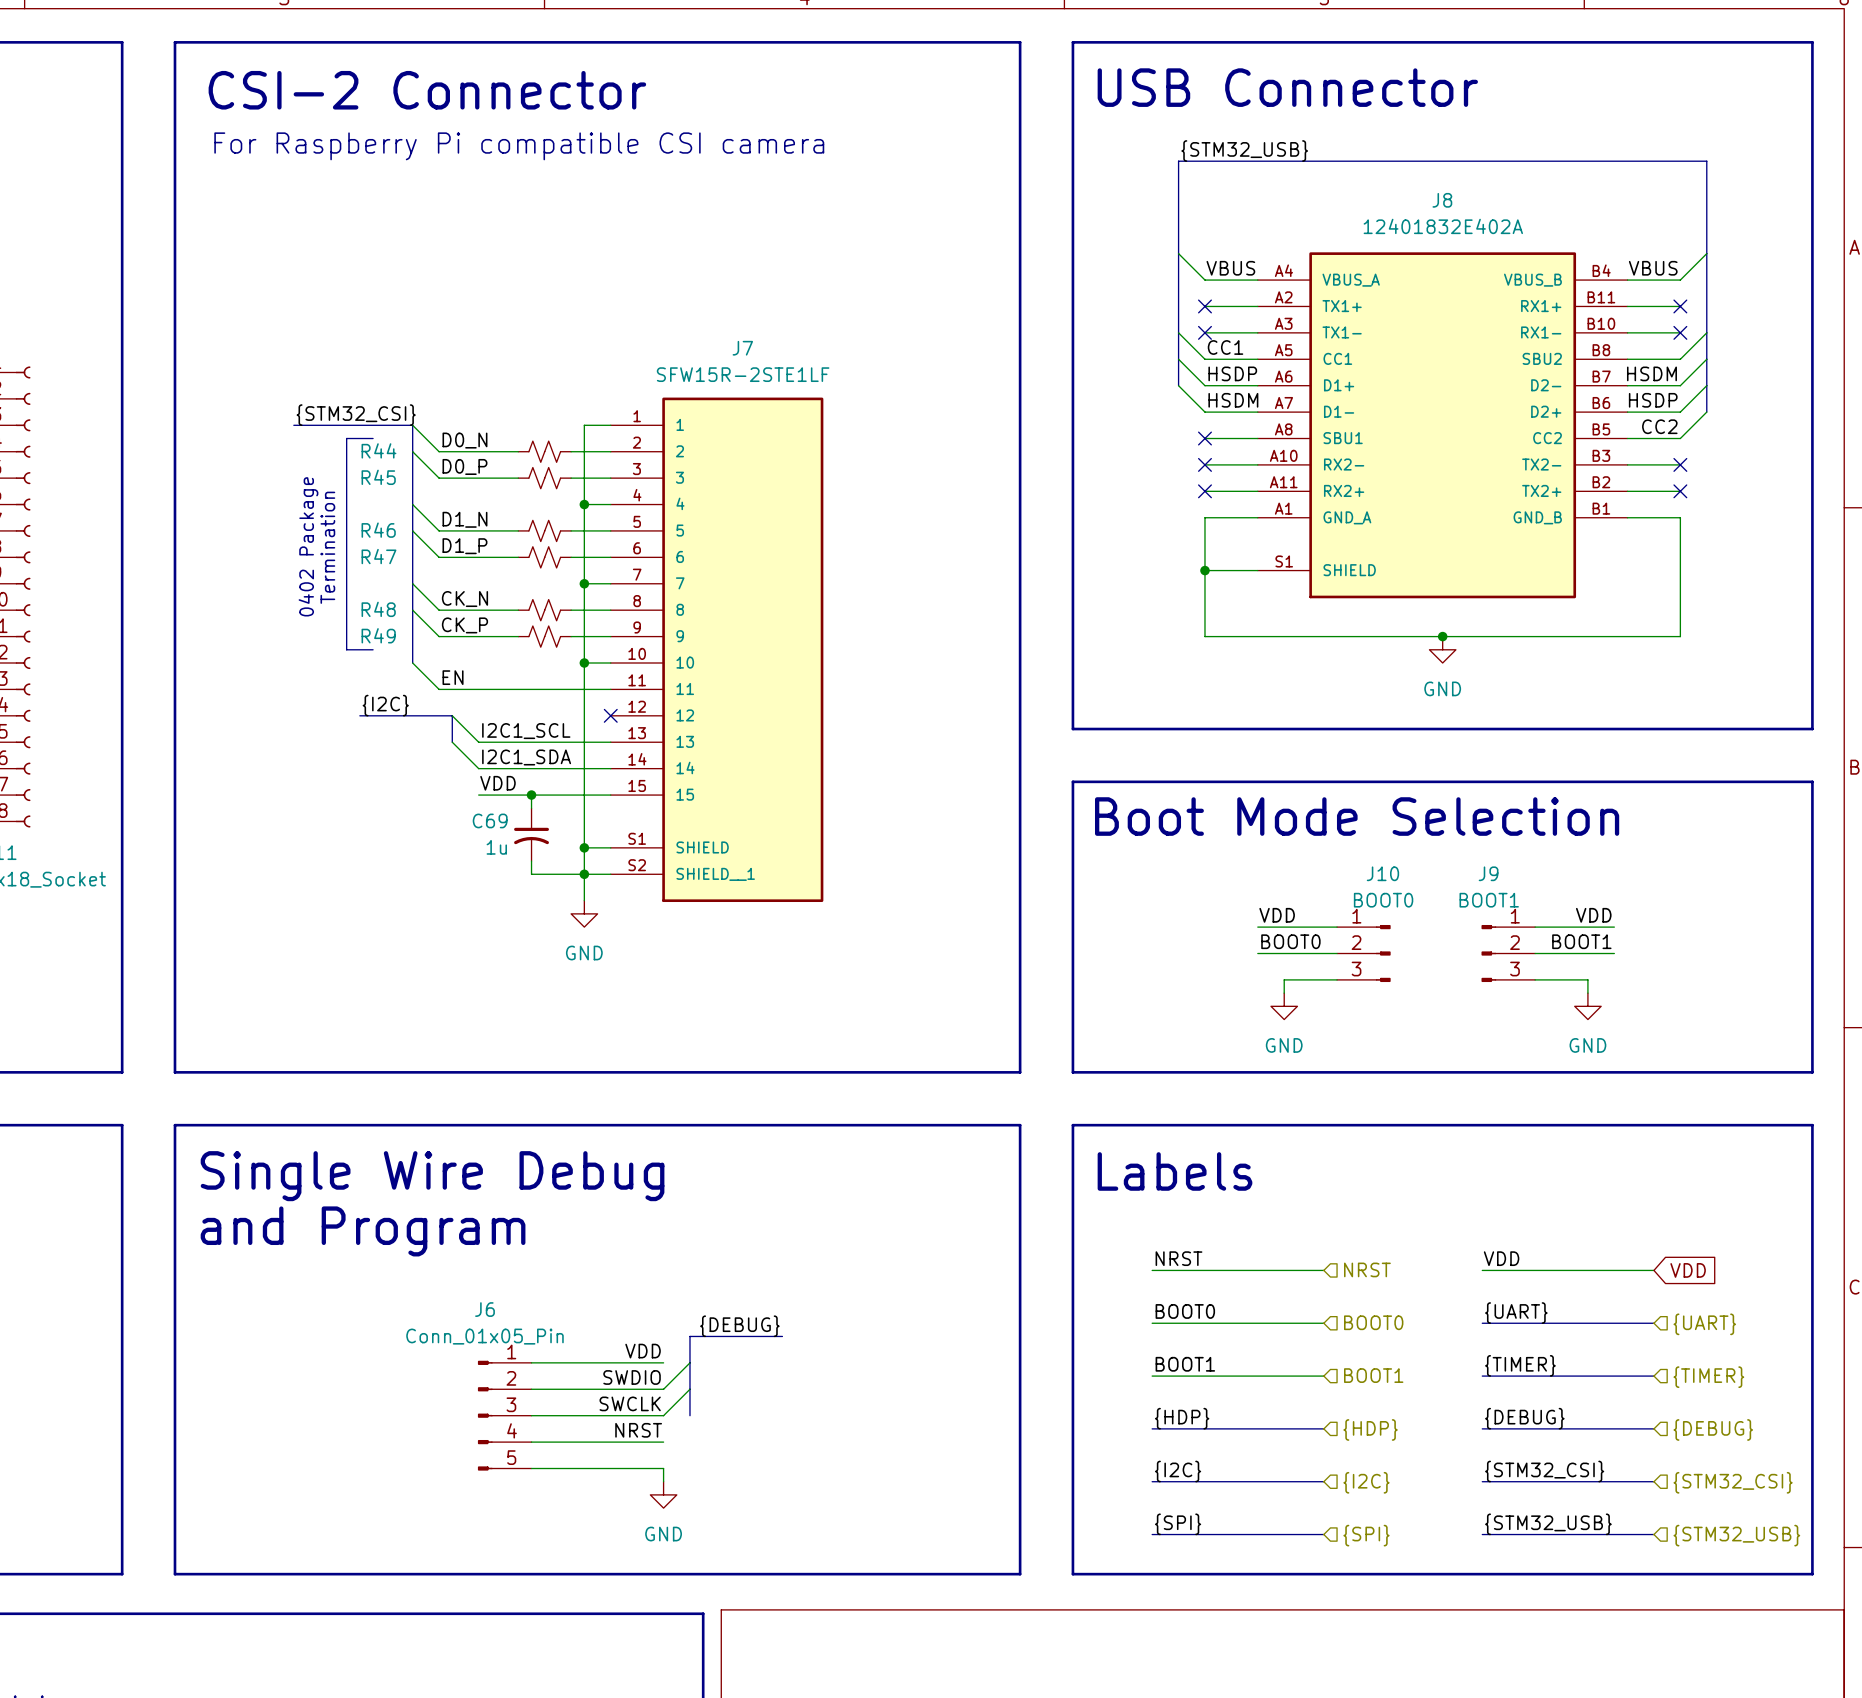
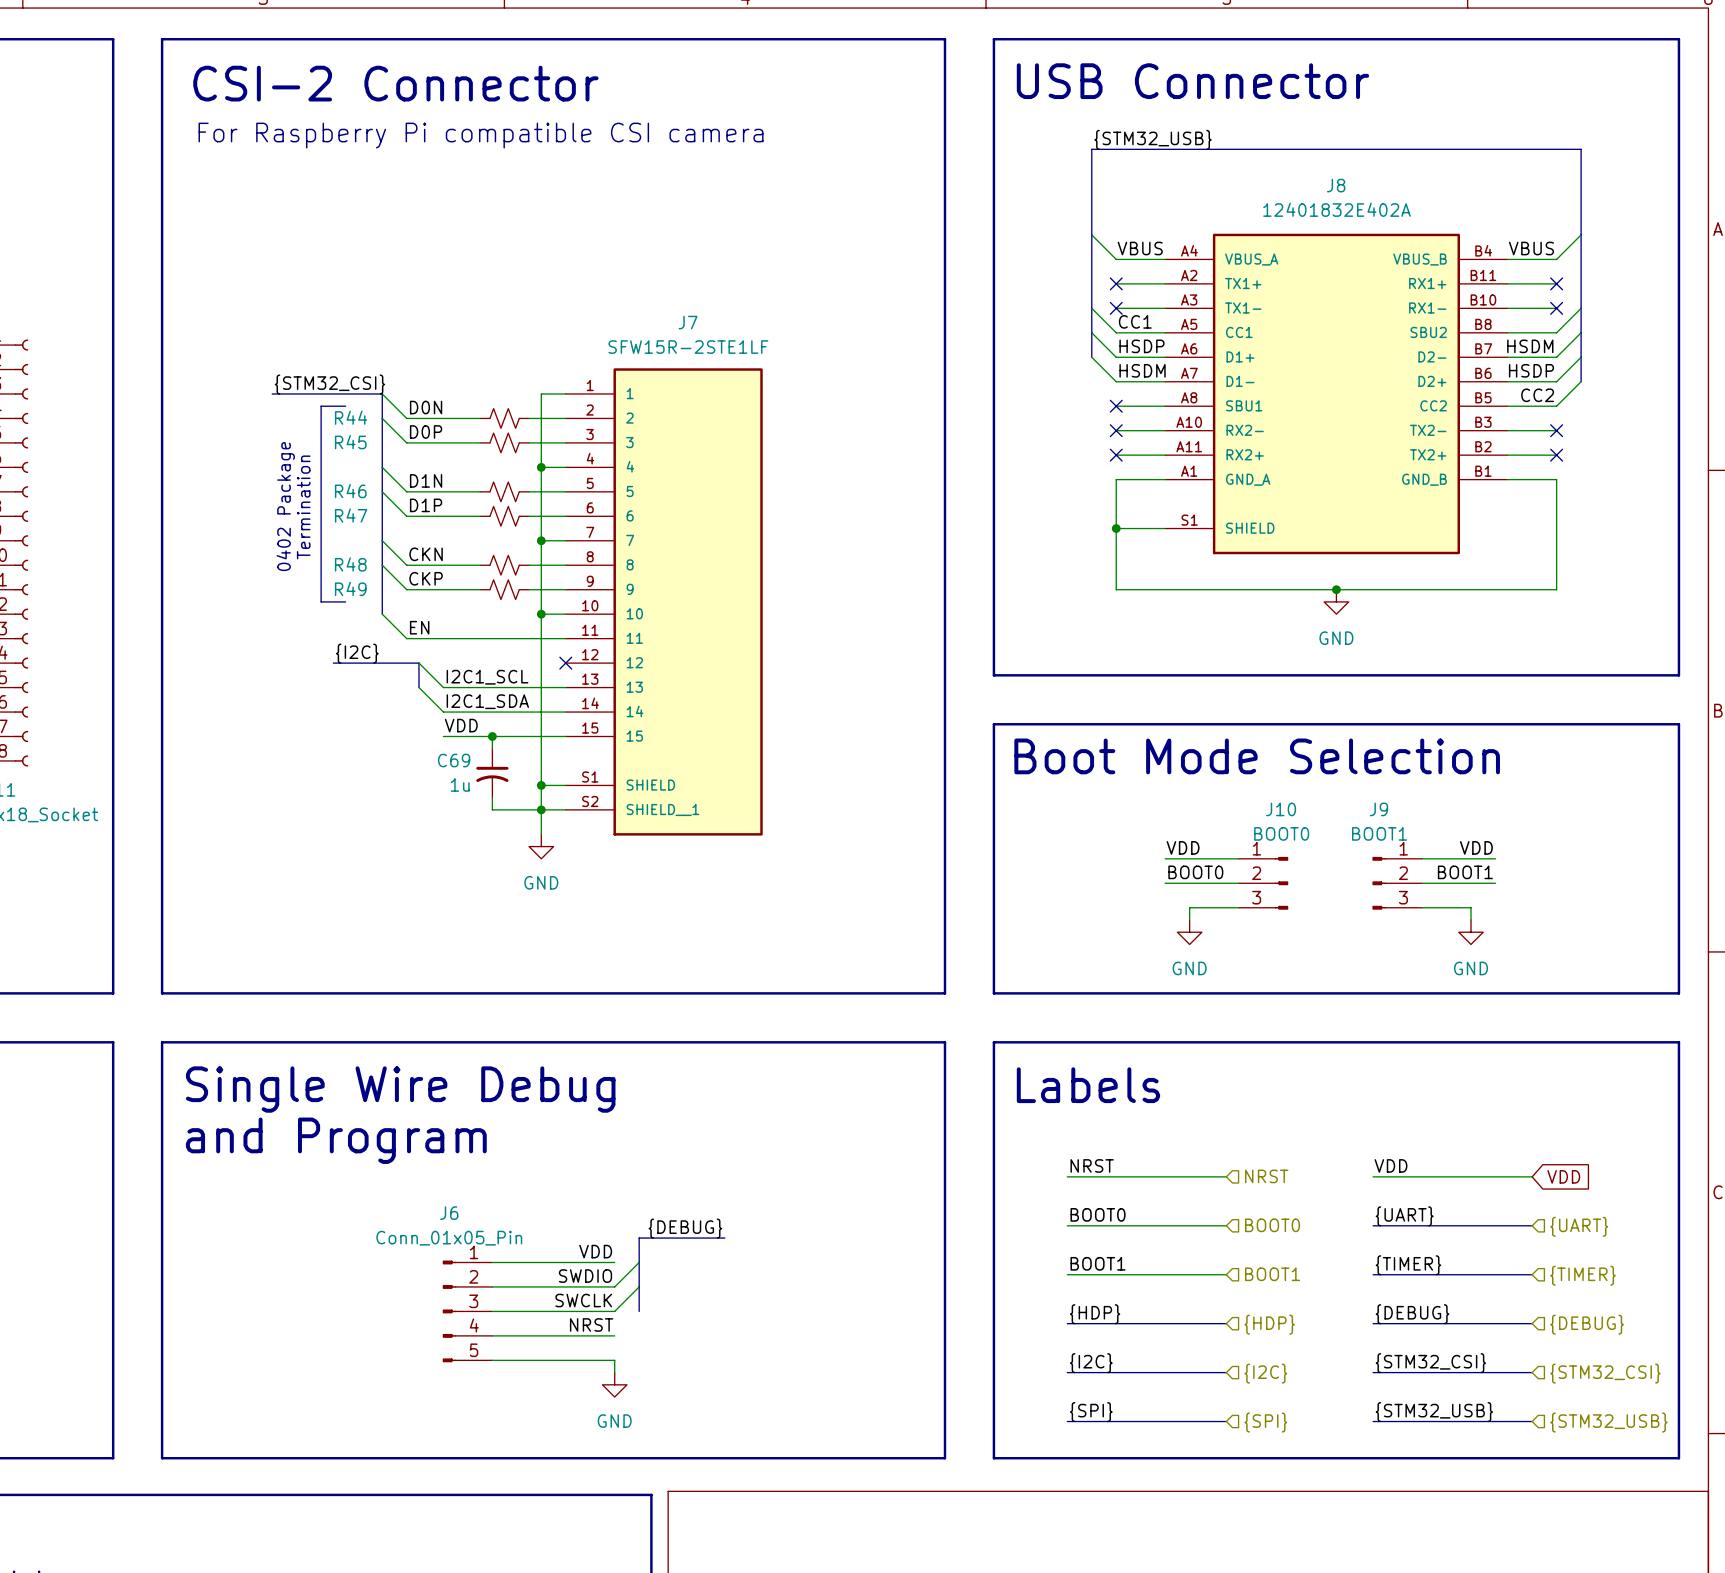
label: D0_N (464, 440) -> D0N (426, 407)
label: D0_P (464, 466) -> D0P (426, 432)
label: D1_N (464, 519) -> D1N (426, 480)
label: D1_P (464, 546) -> D1P (426, 505)
label: CK_N (464, 599) -> CKN (426, 554)
label: CK_P (464, 625) -> CKP (426, 578)

